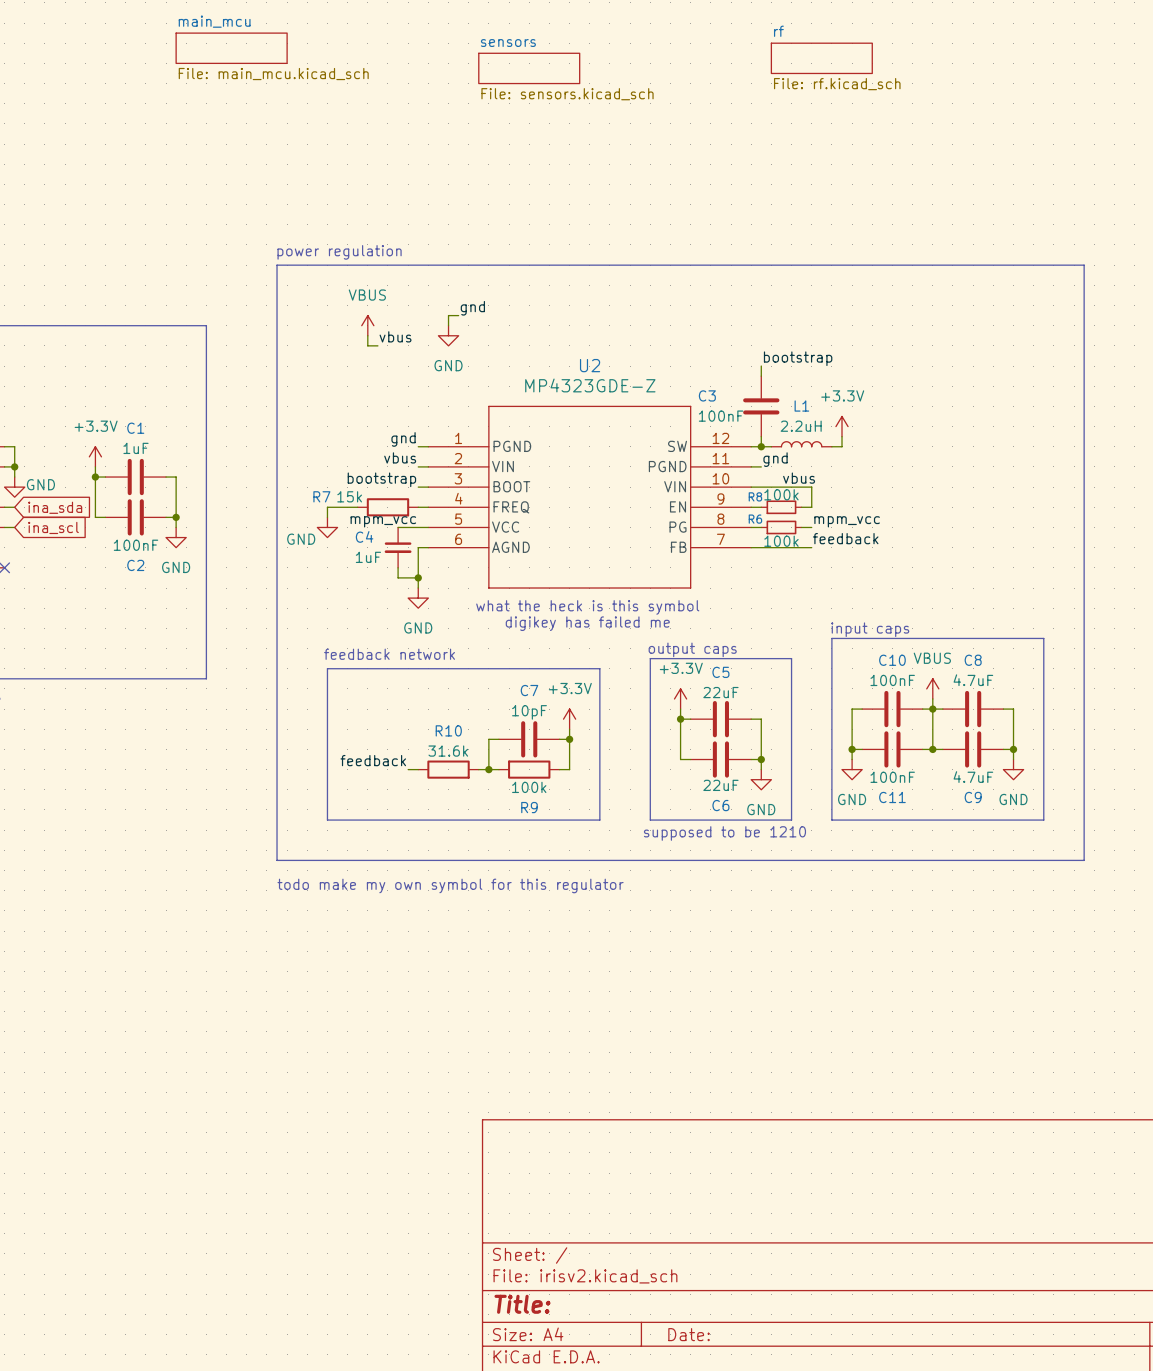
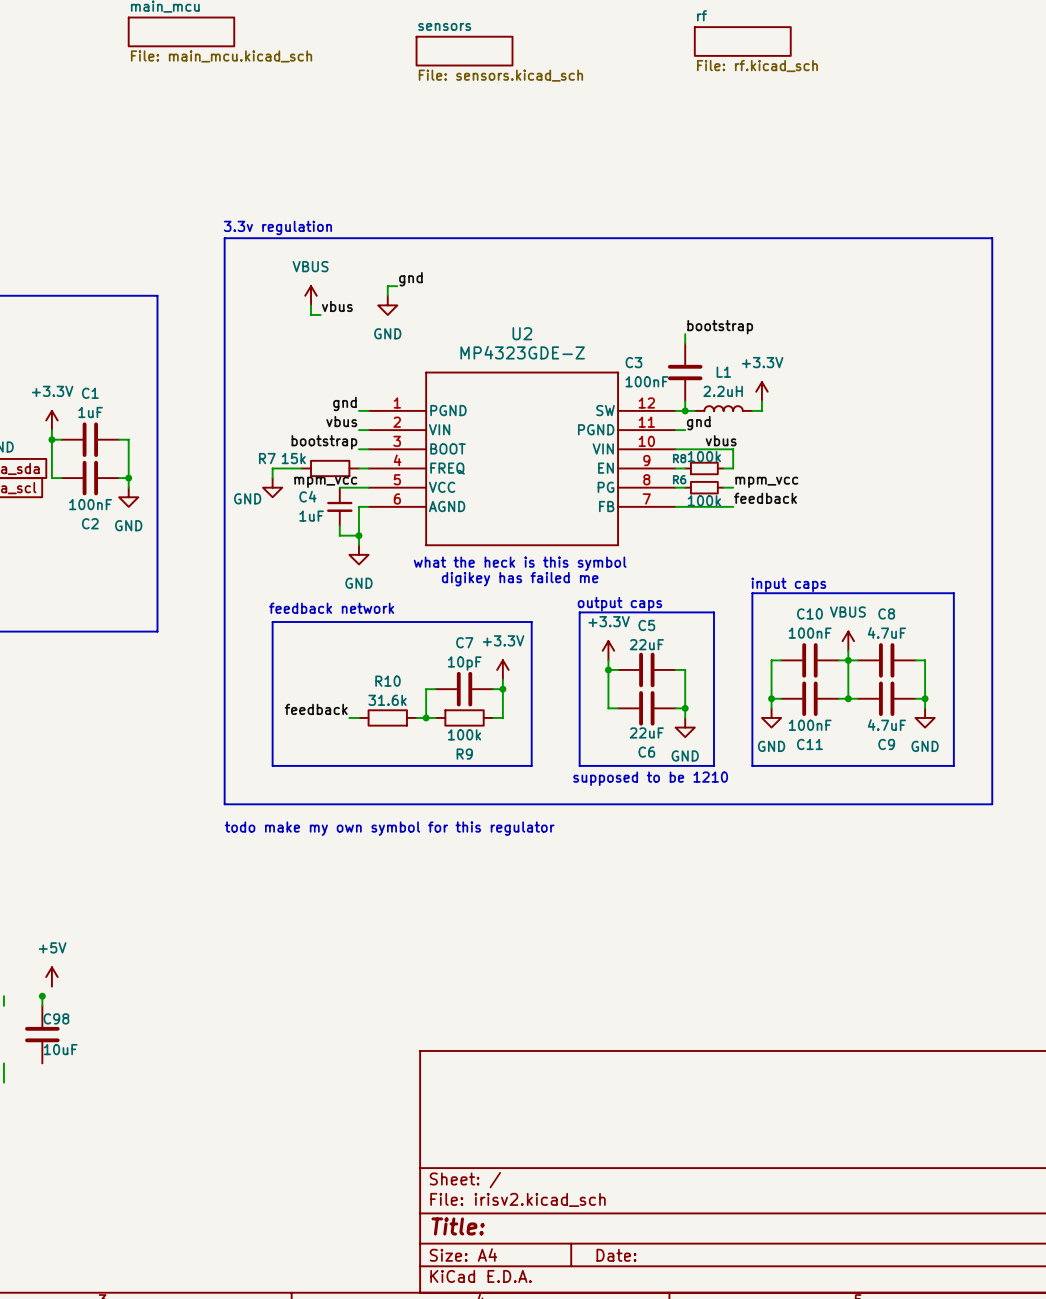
text: power regulation (339, 252) -> 3.3v regulation (277, 227)
power symbol: none -> +5V (51, 977)
wire: none -> (3, 996) (3, 1005)
wire: none -> (42, 996) (42, 1005)
junction: none -> (42, 996)
C98: none -> 10uF (42, 1034)
wire: none -> (3, 1063) (3, 1082)

